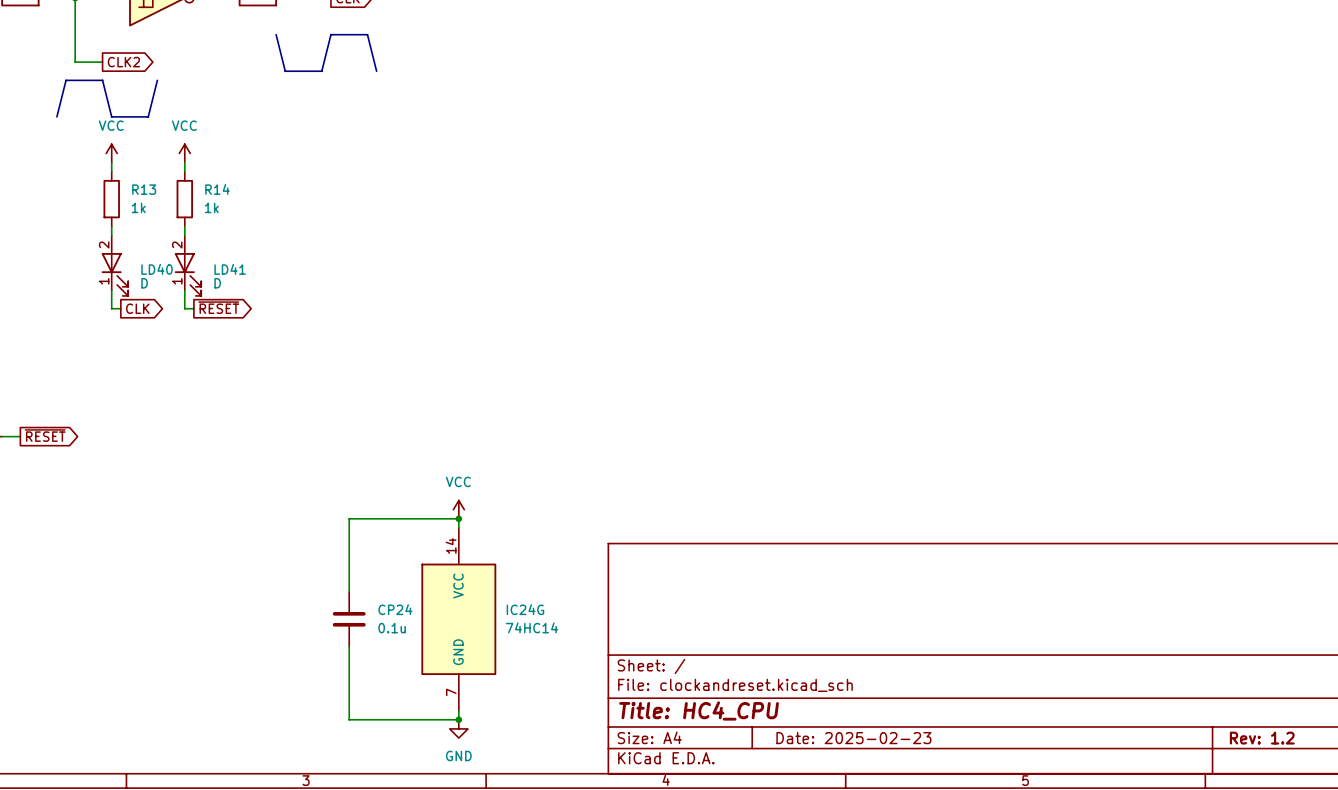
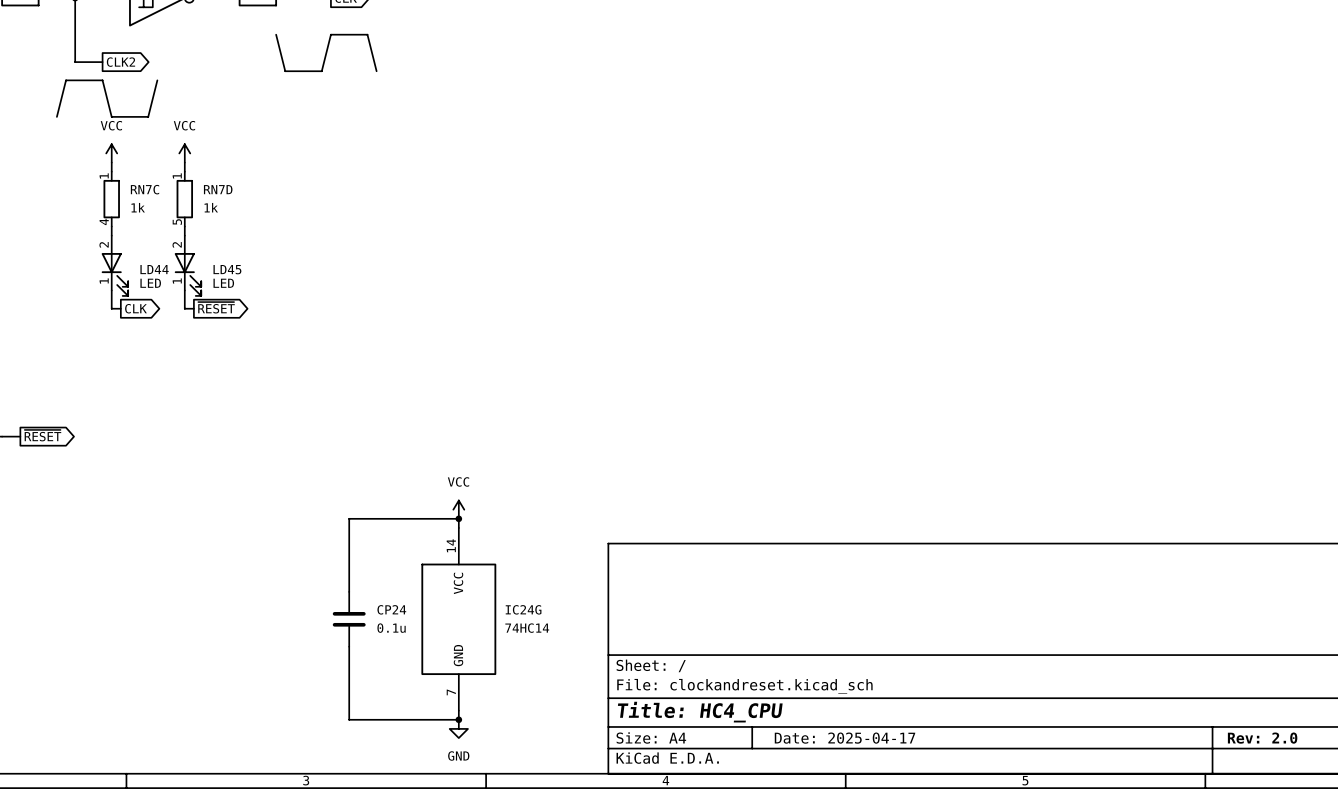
R13 pin number: none -> 1 (104, 175)
R14 pin number: none -> 1 (177, 175)
R13 name: R13 (144, 189) -> RN7C (145, 189)
R14 name: R14 (217, 189) -> RN7D (218, 189)
R13 pin number: none -> 4 (104, 221)
R14 pin number: none -> 5 (177, 222)
LD40 name: LD40 (157, 269) -> LD44 (154, 269)
LD41 name: LD41 (230, 269) -> LD45 (227, 269)
LD40 value: D (144, 283) -> LED (150, 283)
LD41 value: D (217, 283) -> LED (223, 283)
title block: Date: 2025-02-23 (853, 738) -> Date: 2025-04-17 (845, 738)
title block: Rev: 1.2 (1262, 738) -> Rev: 2.0 (1262, 738)

